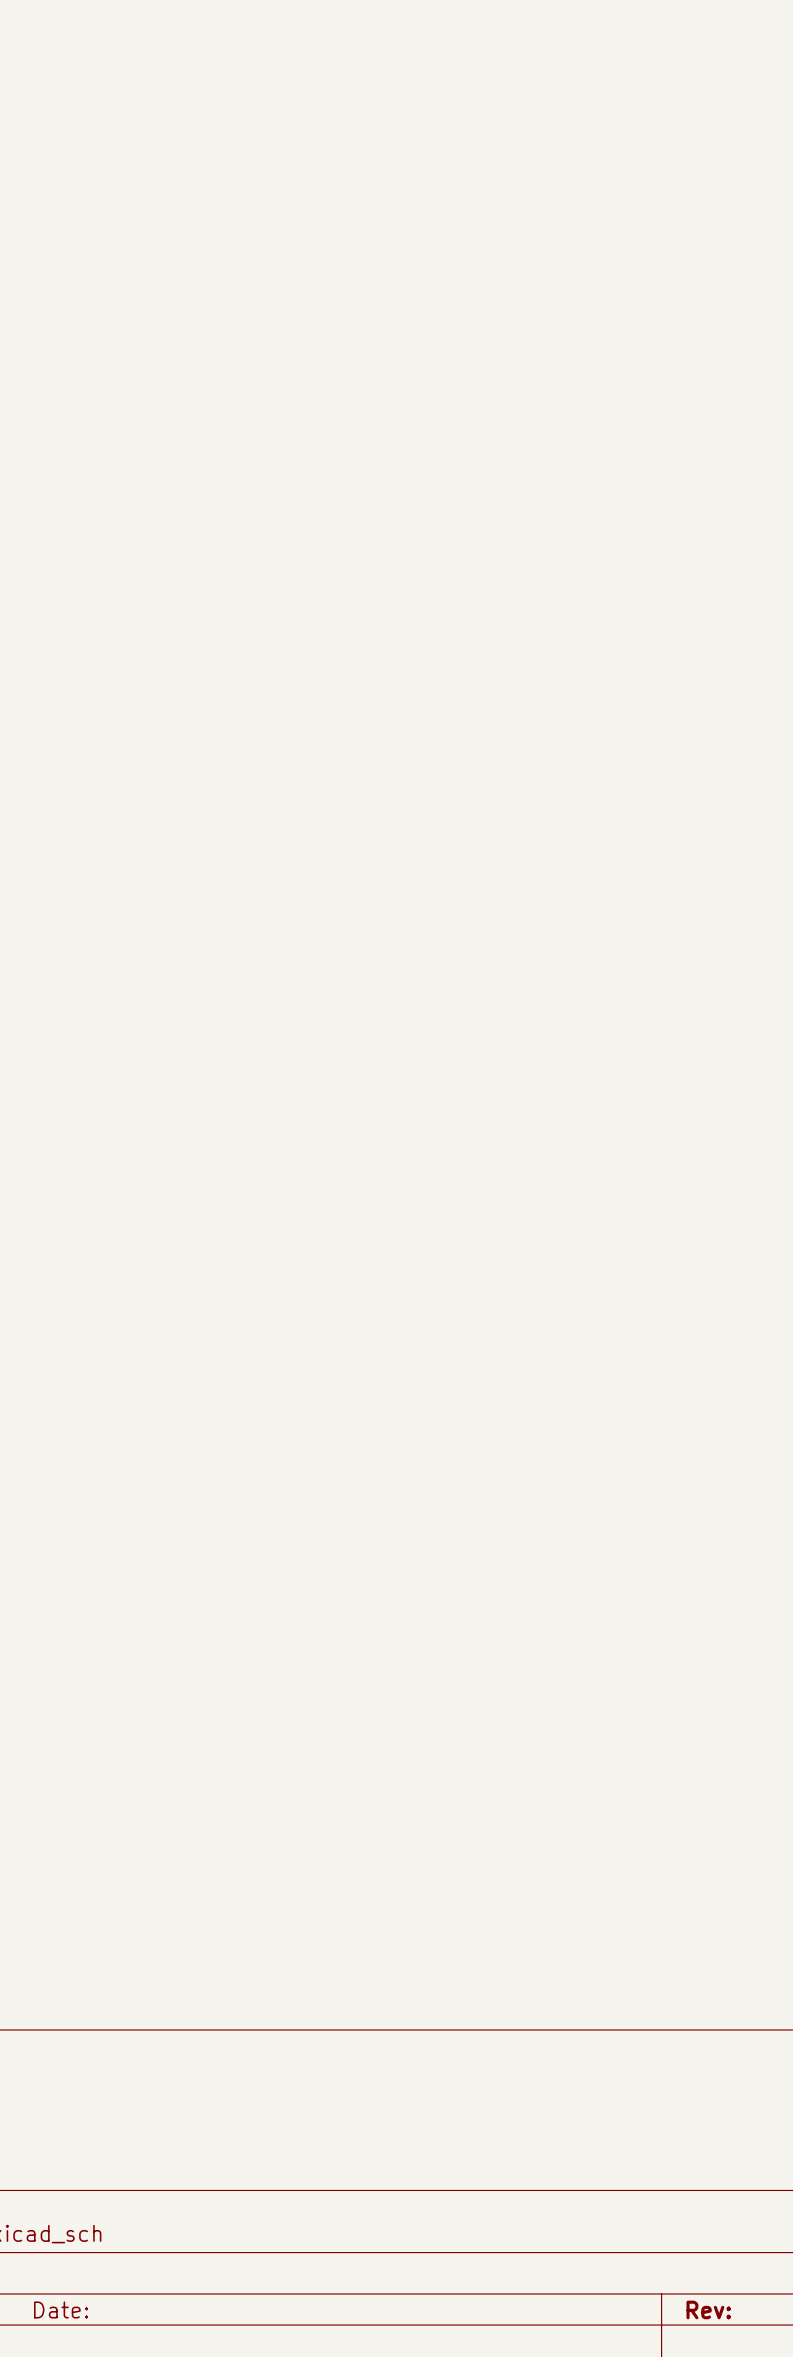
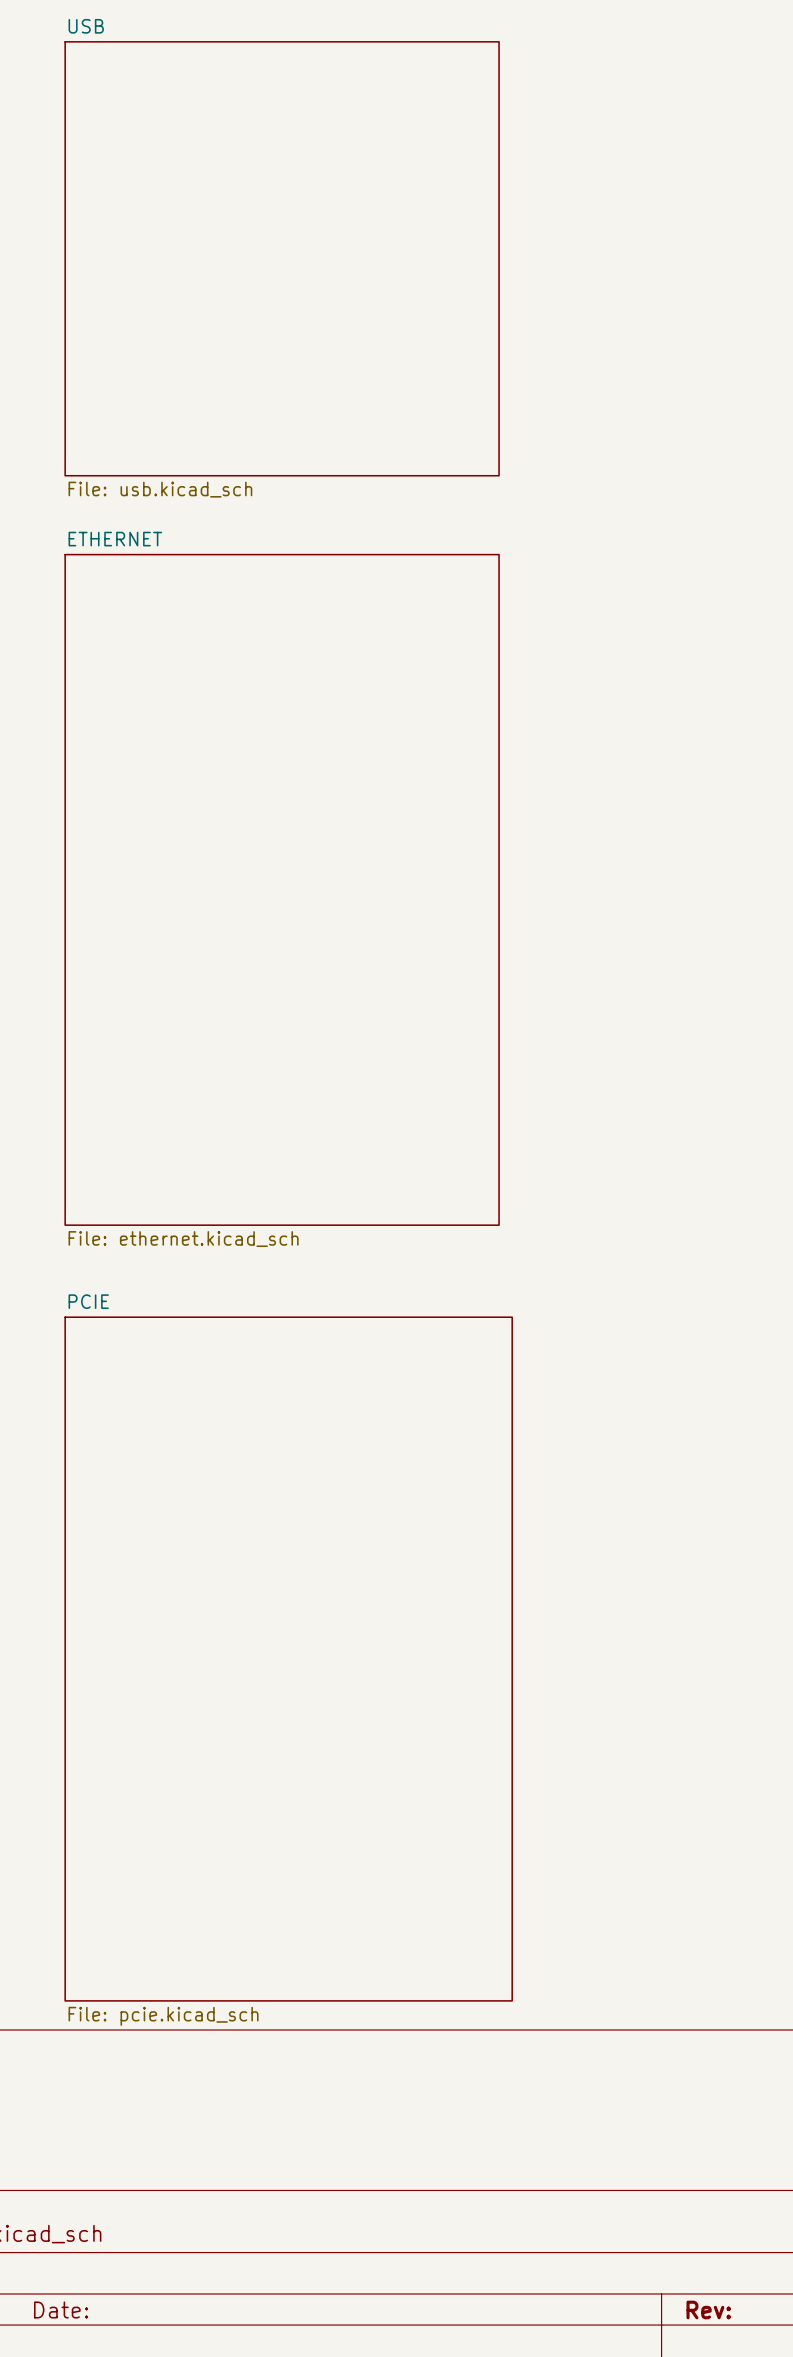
sheet USB: none -> File: usb.kicad_sch (282, 258)
sheet ETHERNET: none -> File: ethernet.kicad_sch (282, 889)
sheet PCIE: none -> File: pcie.kicad_sch (288, 1659)

